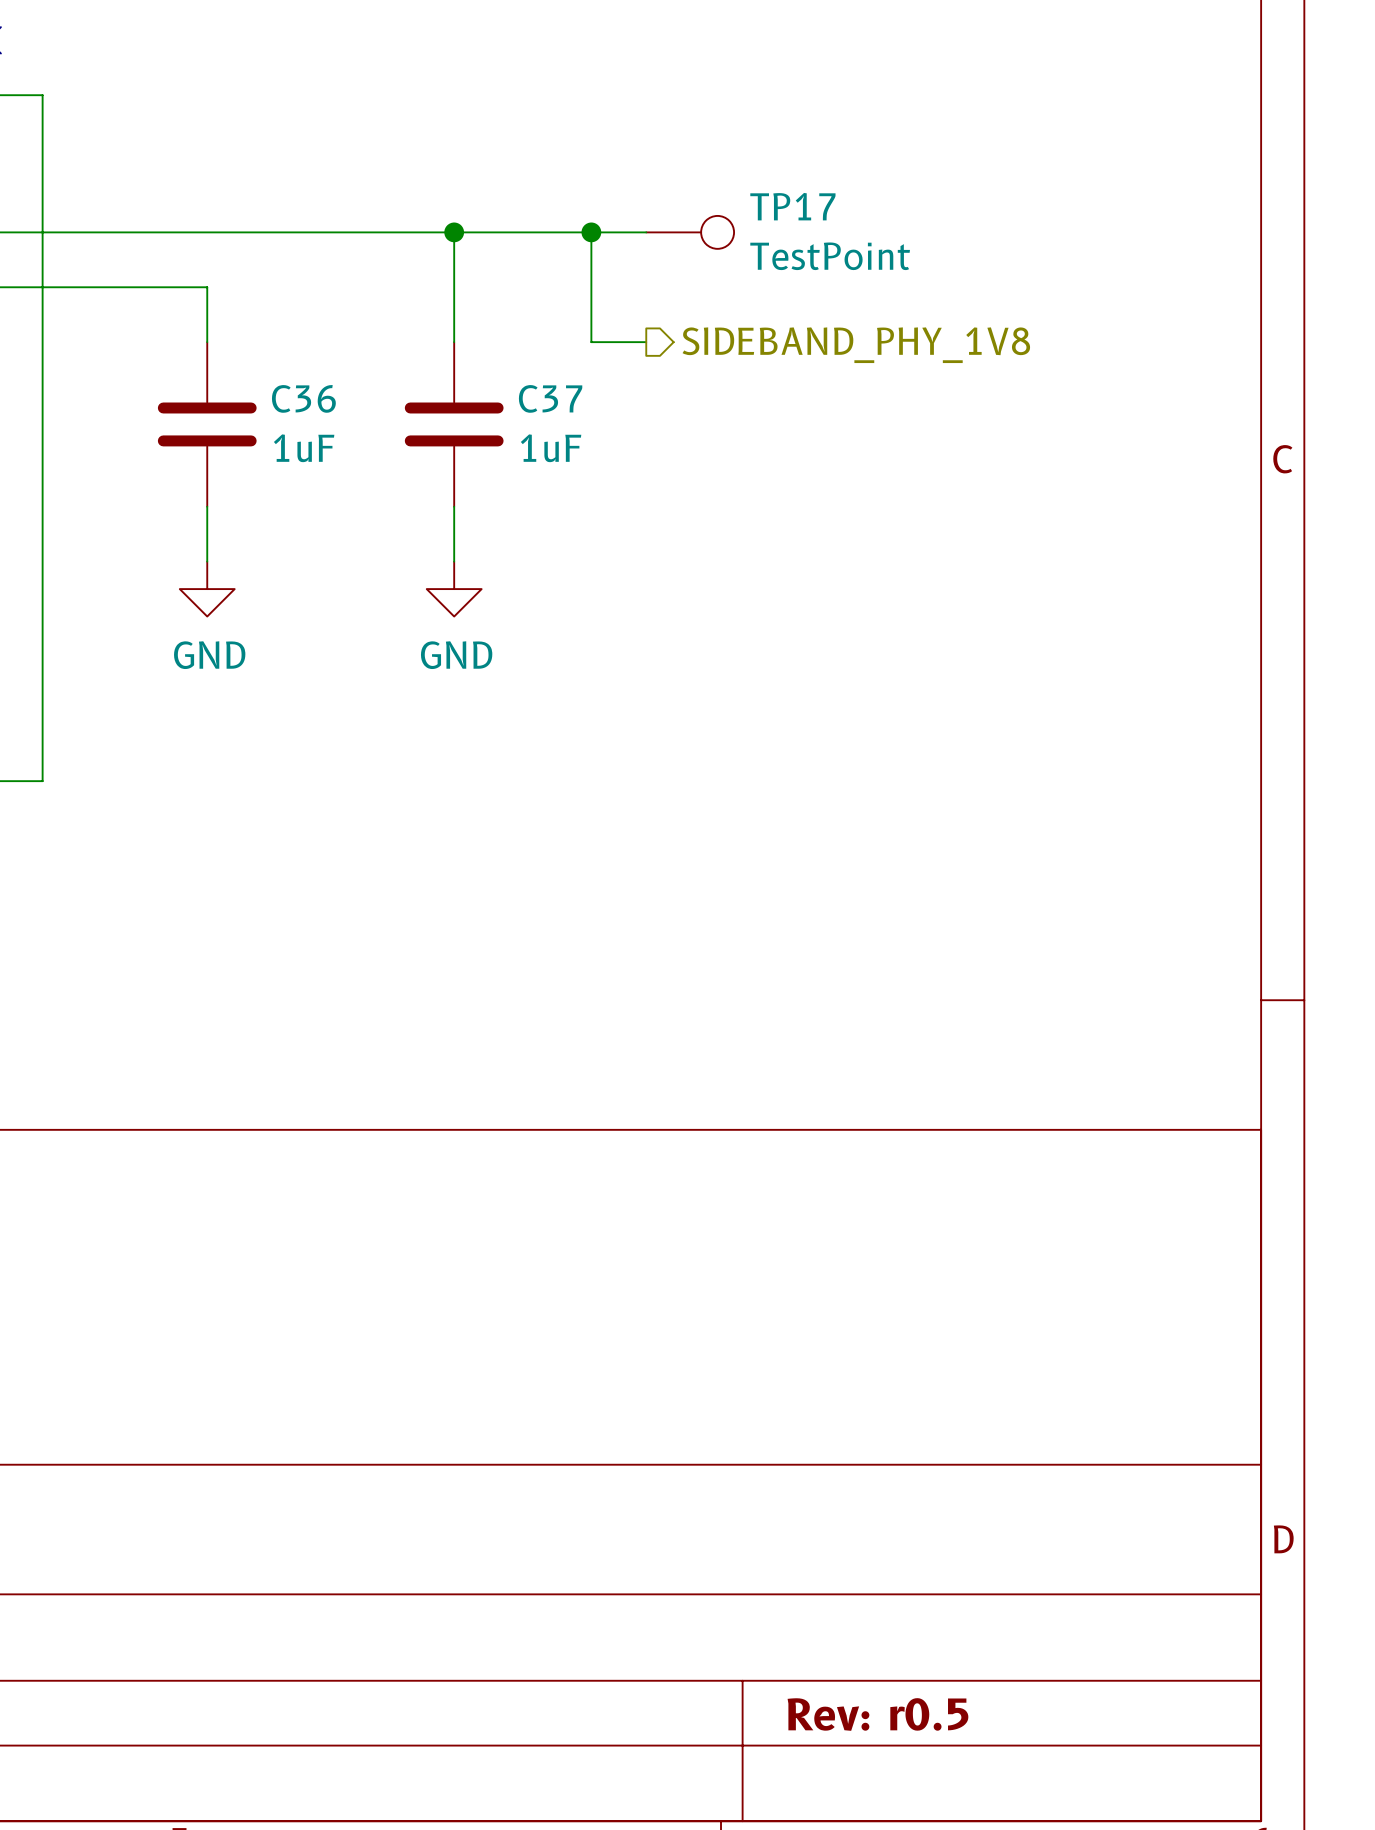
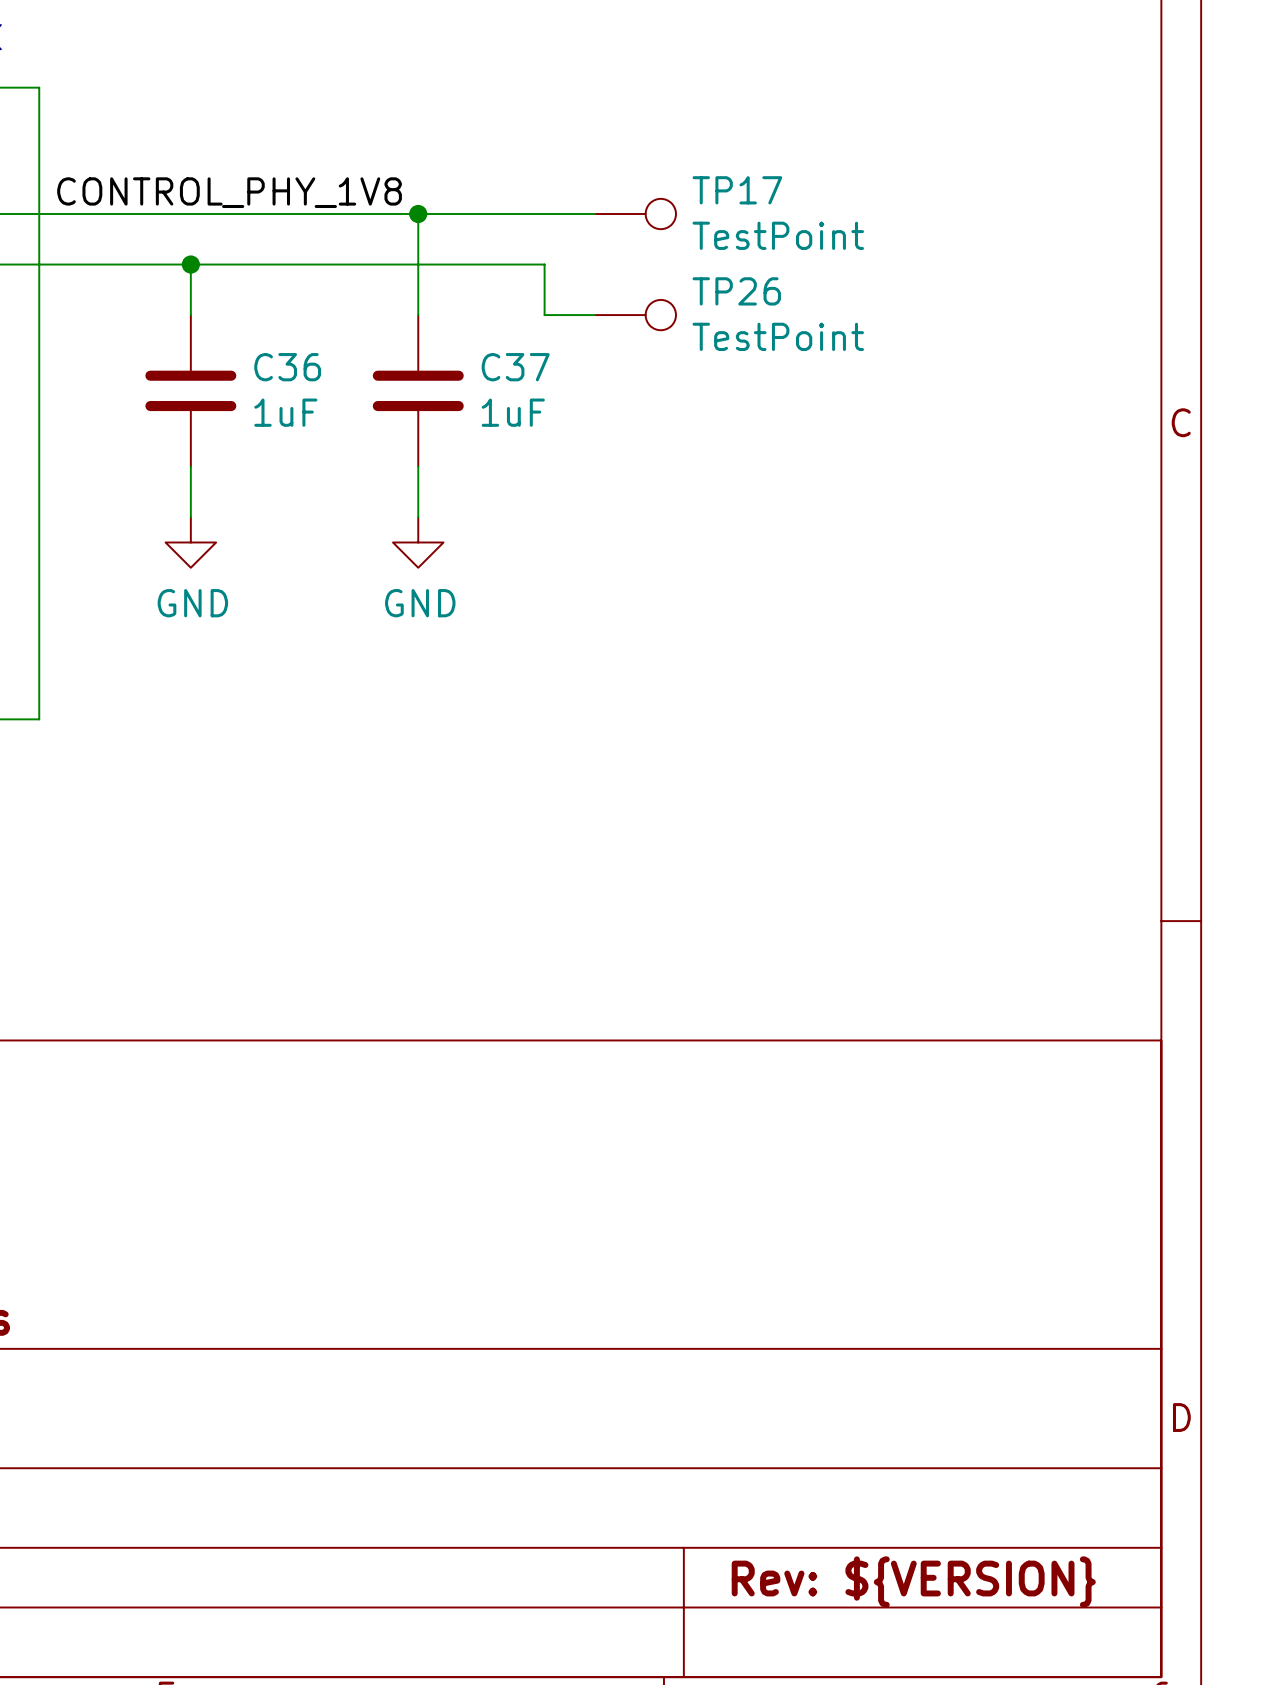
label: none -> CONTROL_PHY_1V8 (229, 192)
wire: (591, 232) (591, 287) -> (190, 264) (544, 264)
junction: (591, 232) -> none
junction: none -> (190, 264)
TP26: none -> TestPoint (635, 315)
hierarchical label: SIDEBAND_PHY_1V8 (856, 345) -> none
title block: Rev: r0.5 (877, 1714) -> Rev: ${VERSION} (913, 1582)

